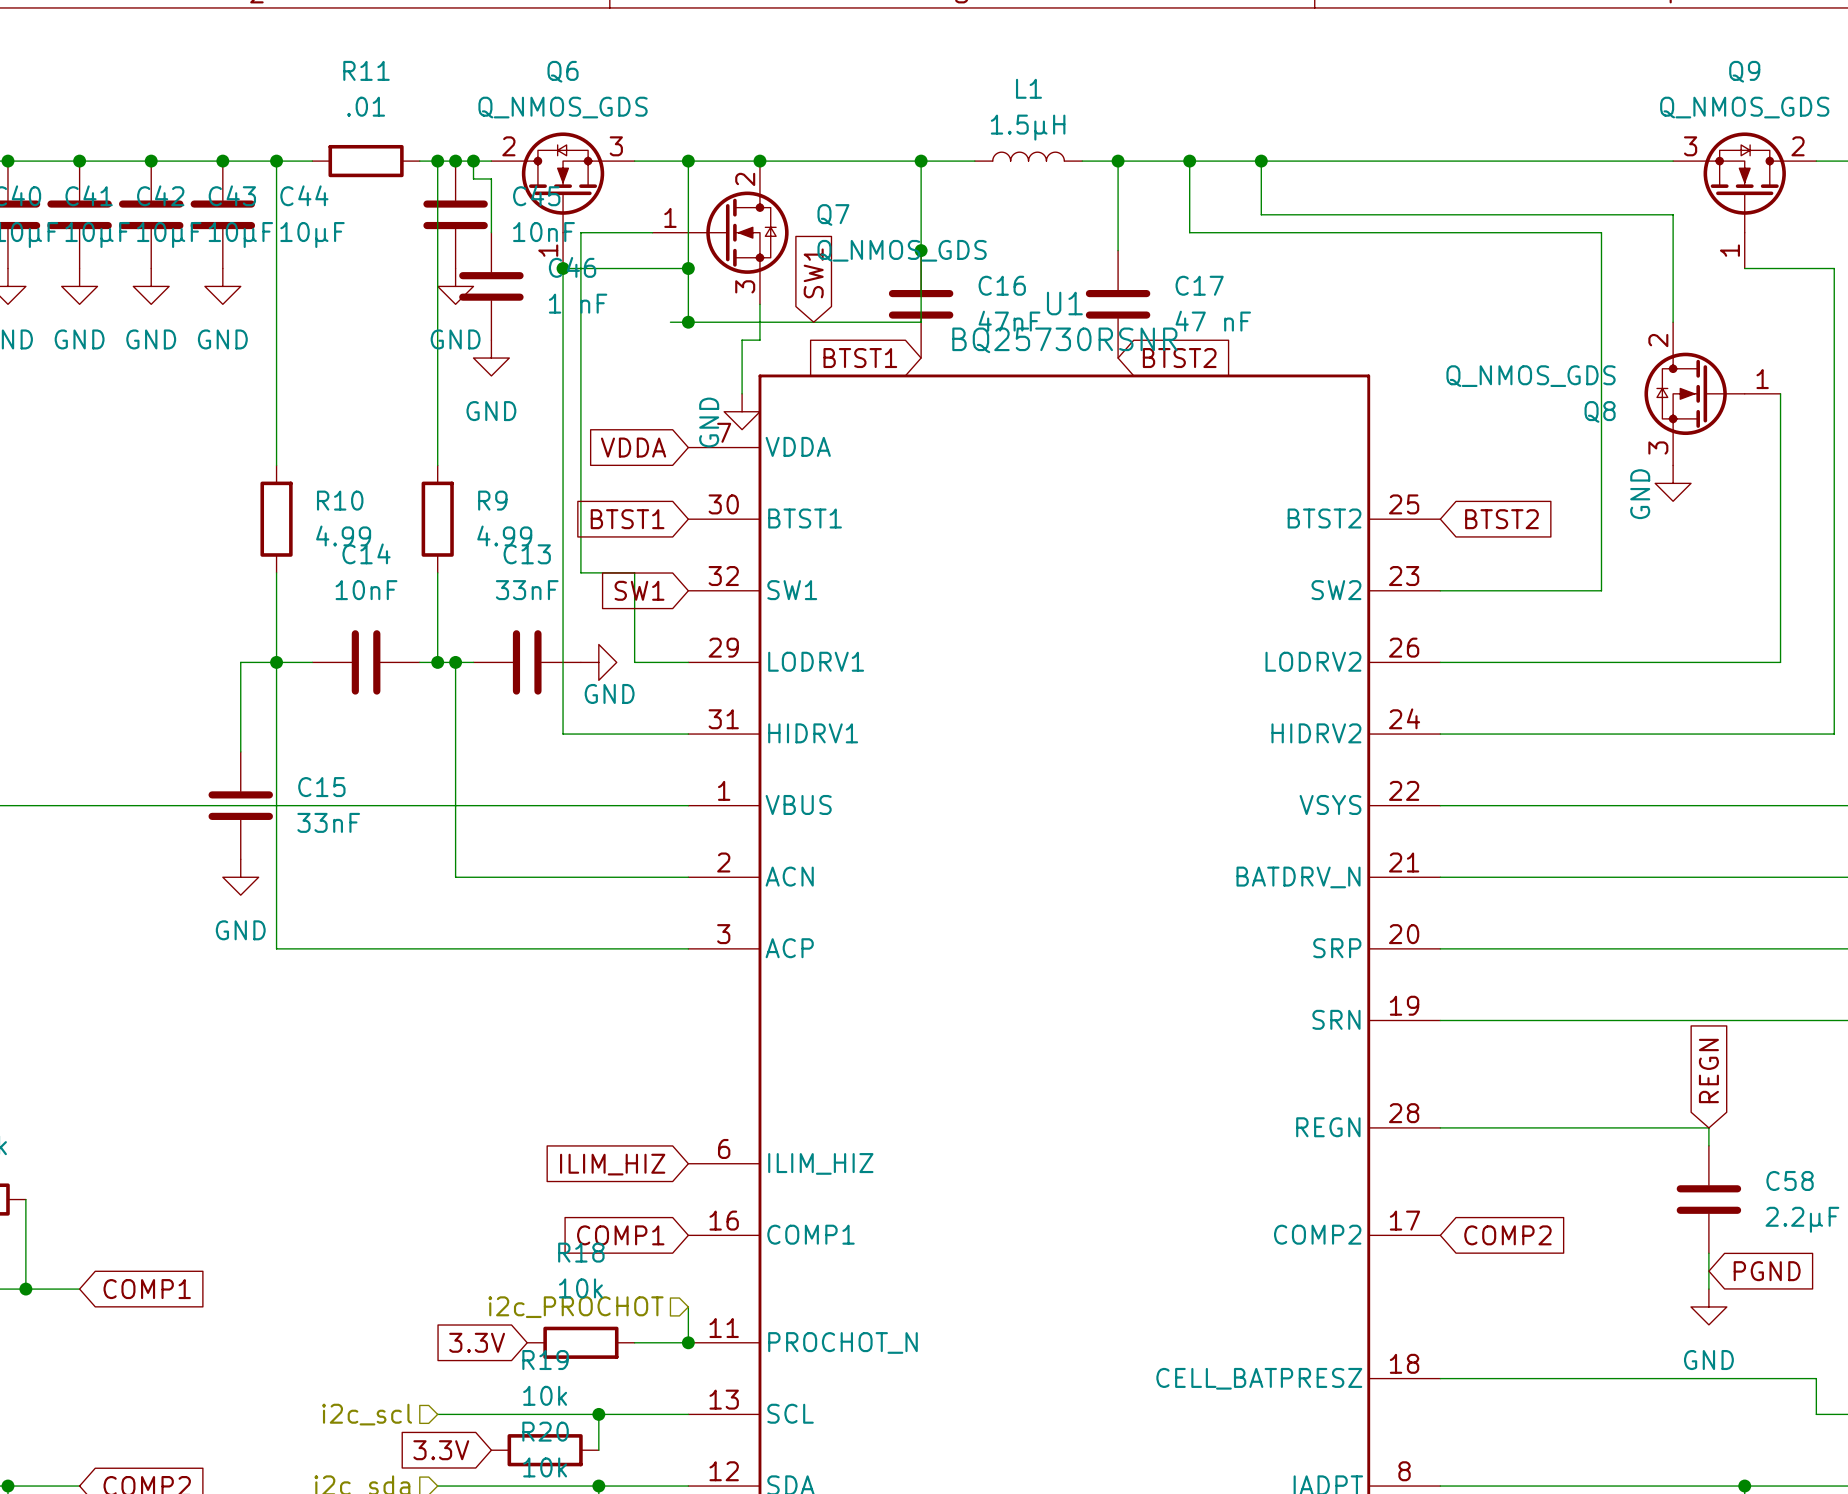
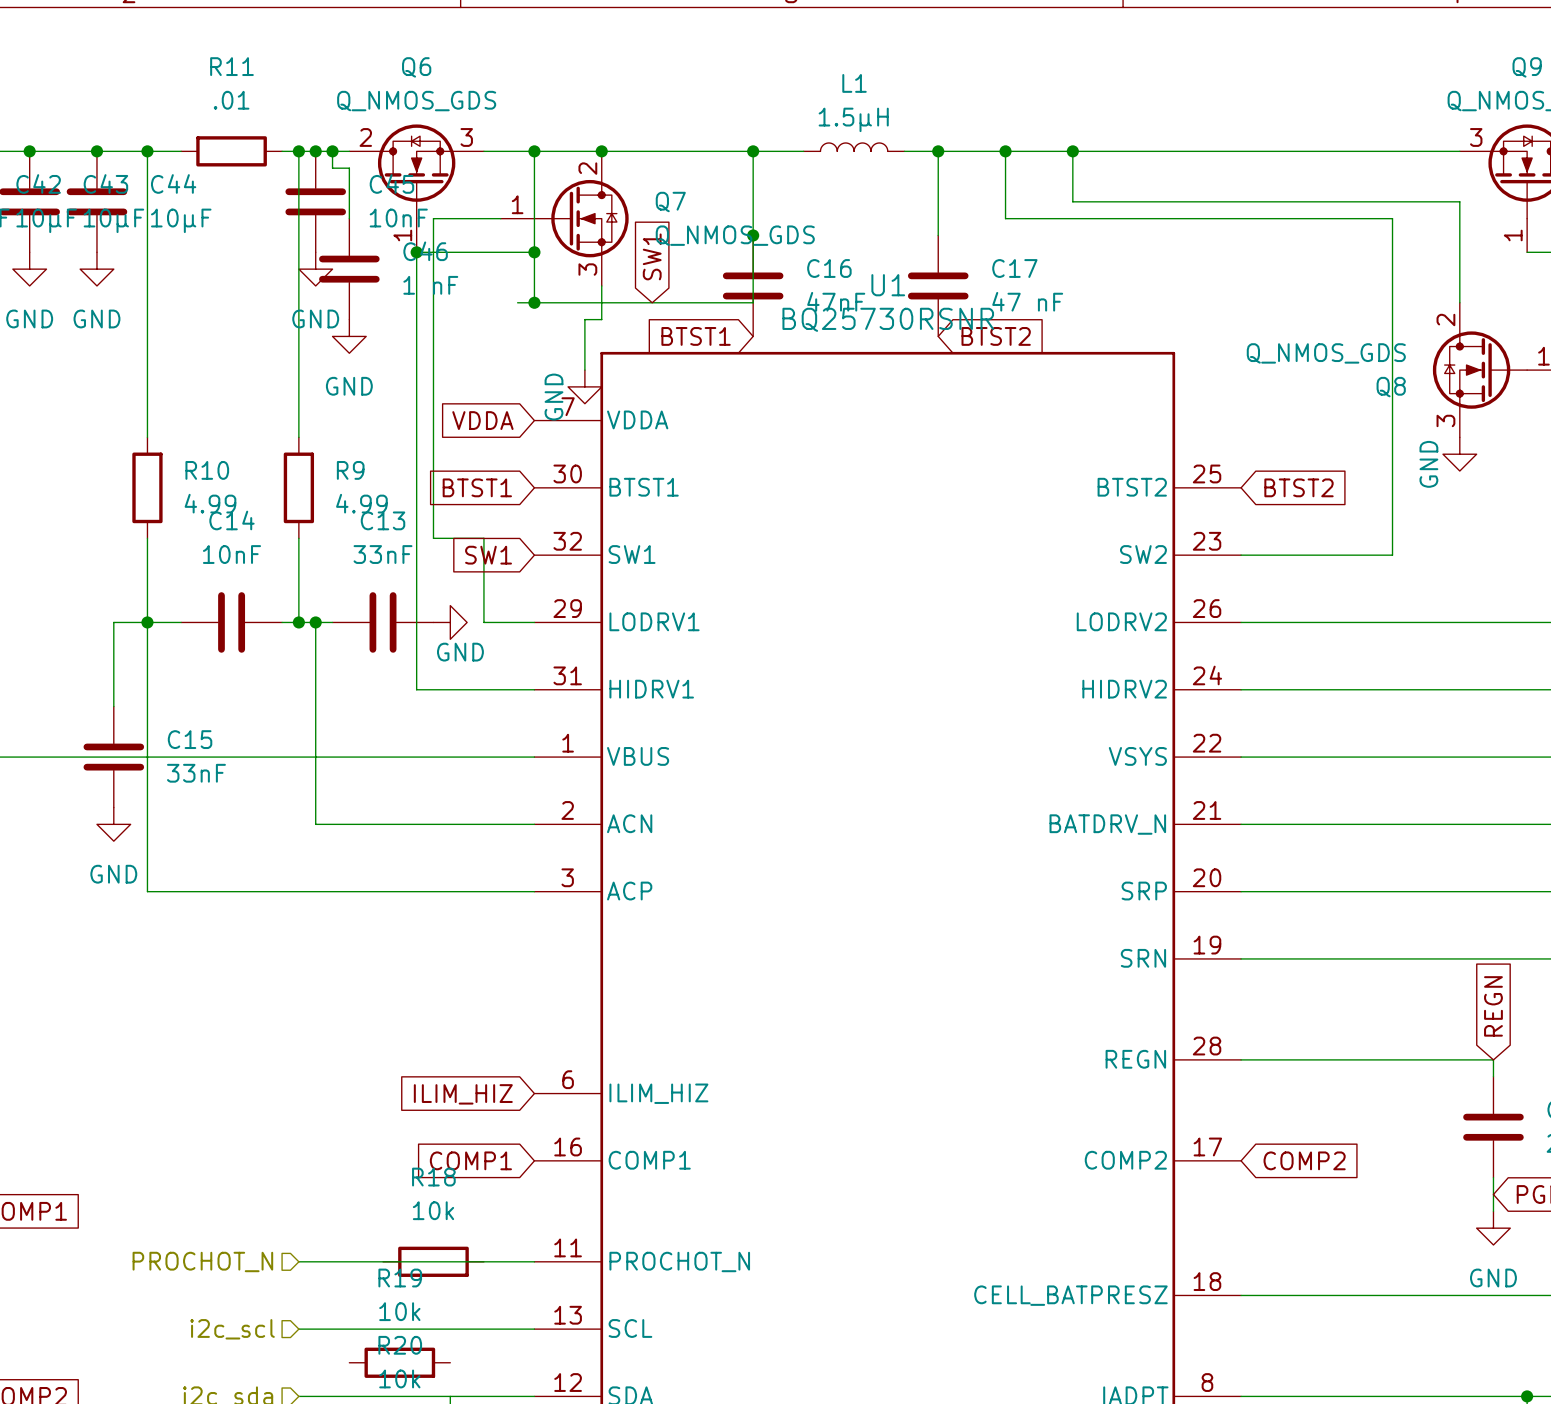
wire: (688, 1306) (688, 1342) -> none
hierarchical label: i2c_PROCHOT (575, 1307) -> none
hierarchical label: none -> PROCHOT_N (202, 1261)
wire: none -> (298, 1261) (483, 1261)
global label: 3.3V (477, 1342) -> none
junction: (688, 1342) -> none
wire: (598, 1414) (598, 1450) -> none
junction: (598, 1414) -> none
global label: 3.3V (441, 1450) -> none
junction: (598, 1486) -> none

